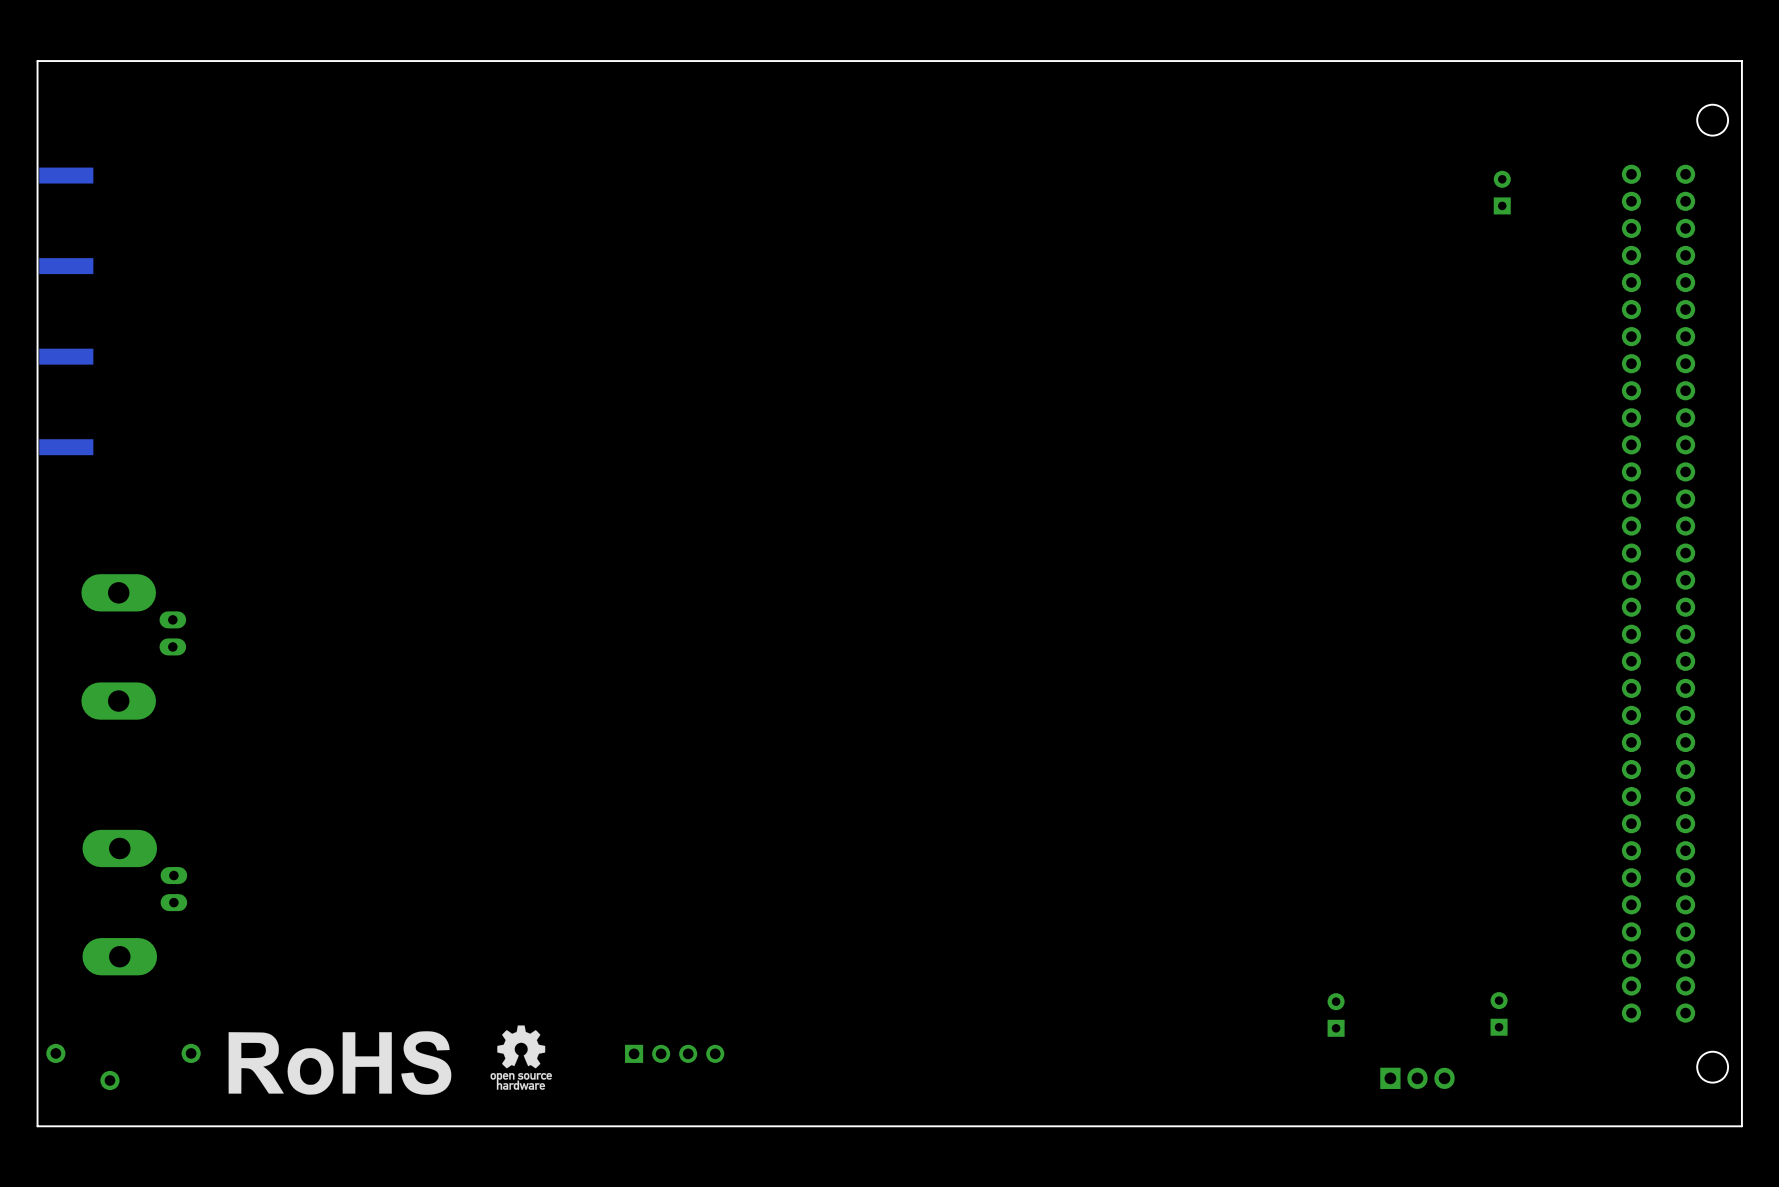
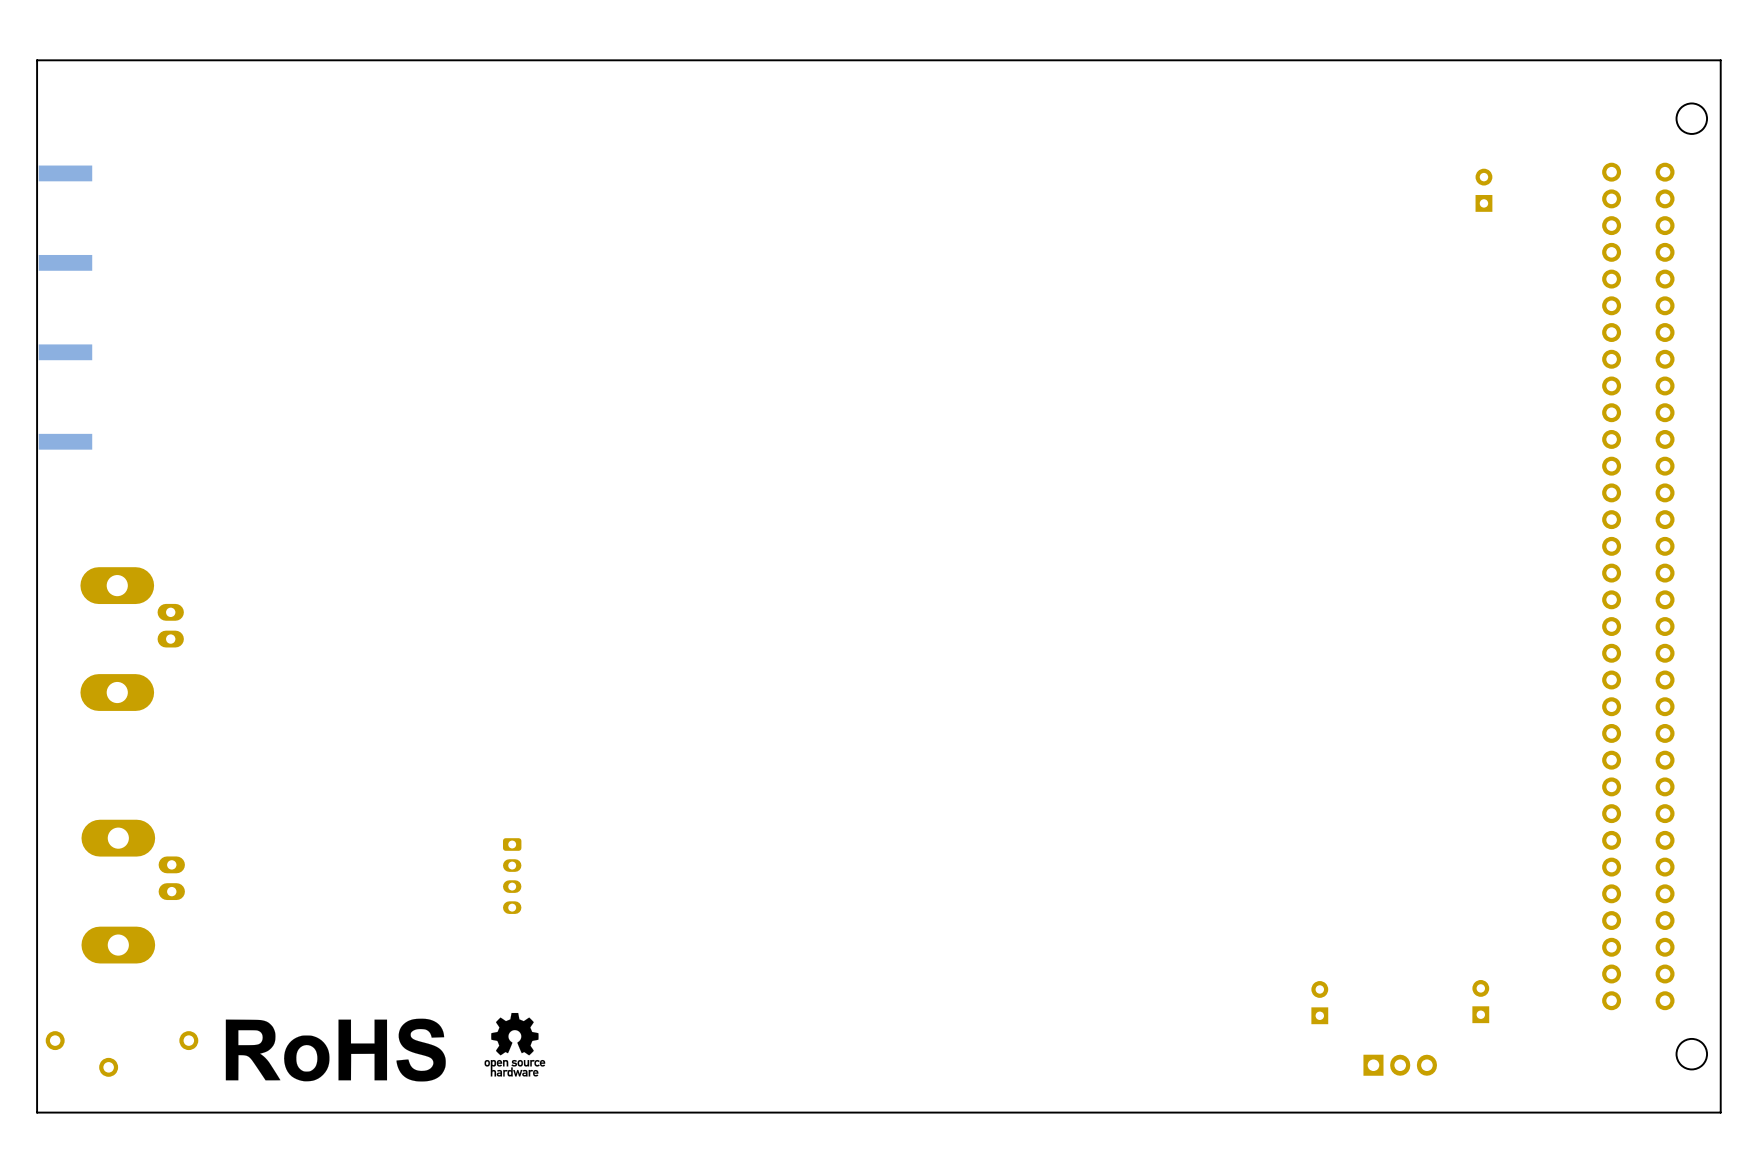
part: none -> (512, 876)
part: (674, 1053) -> none

